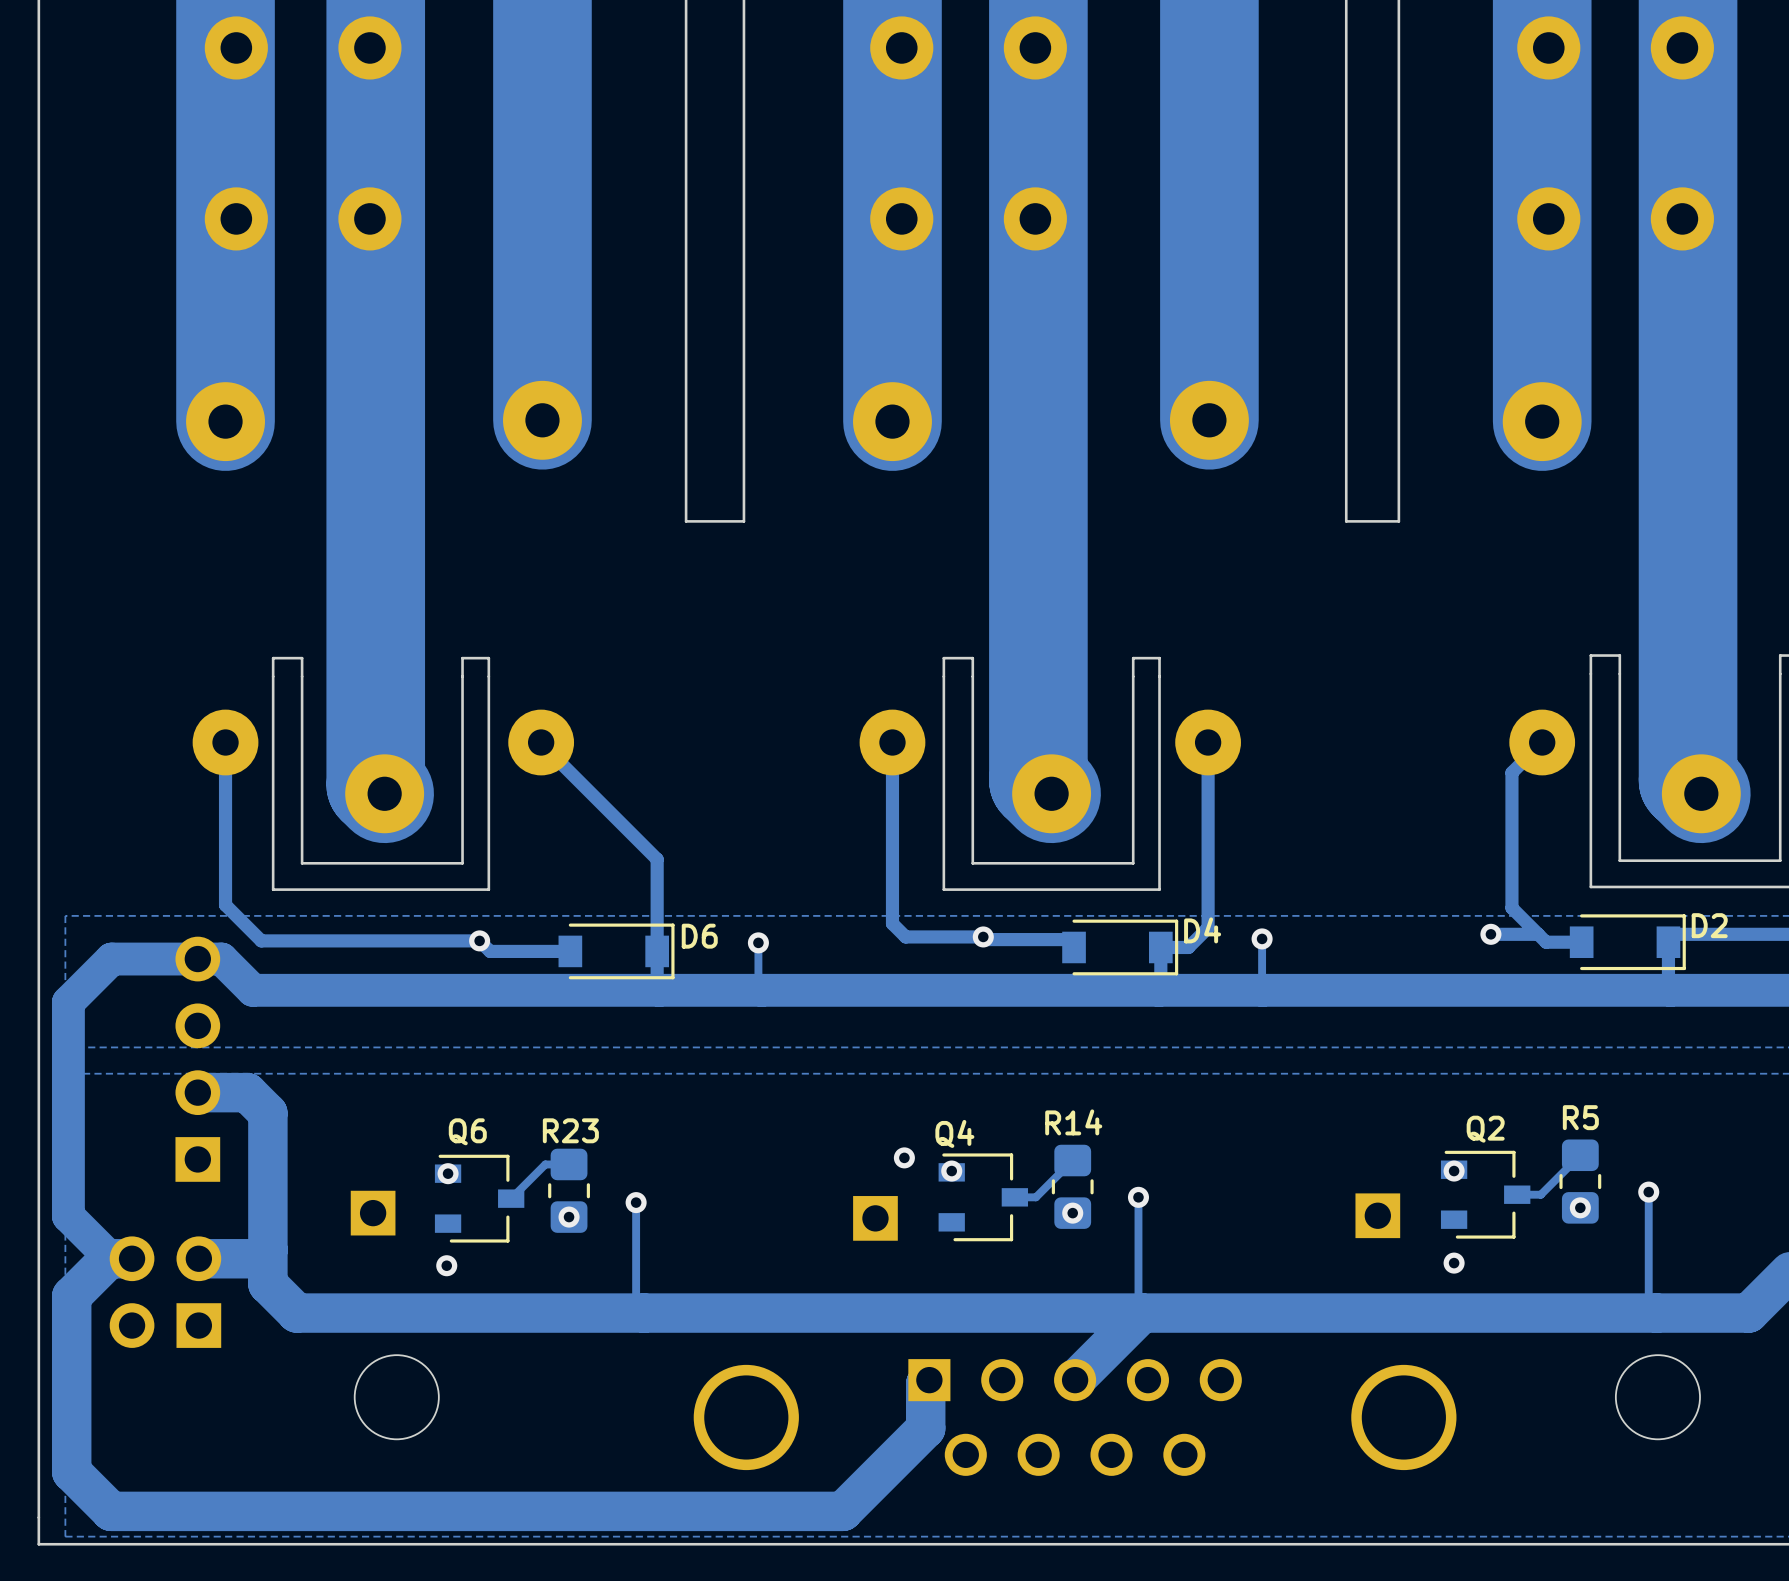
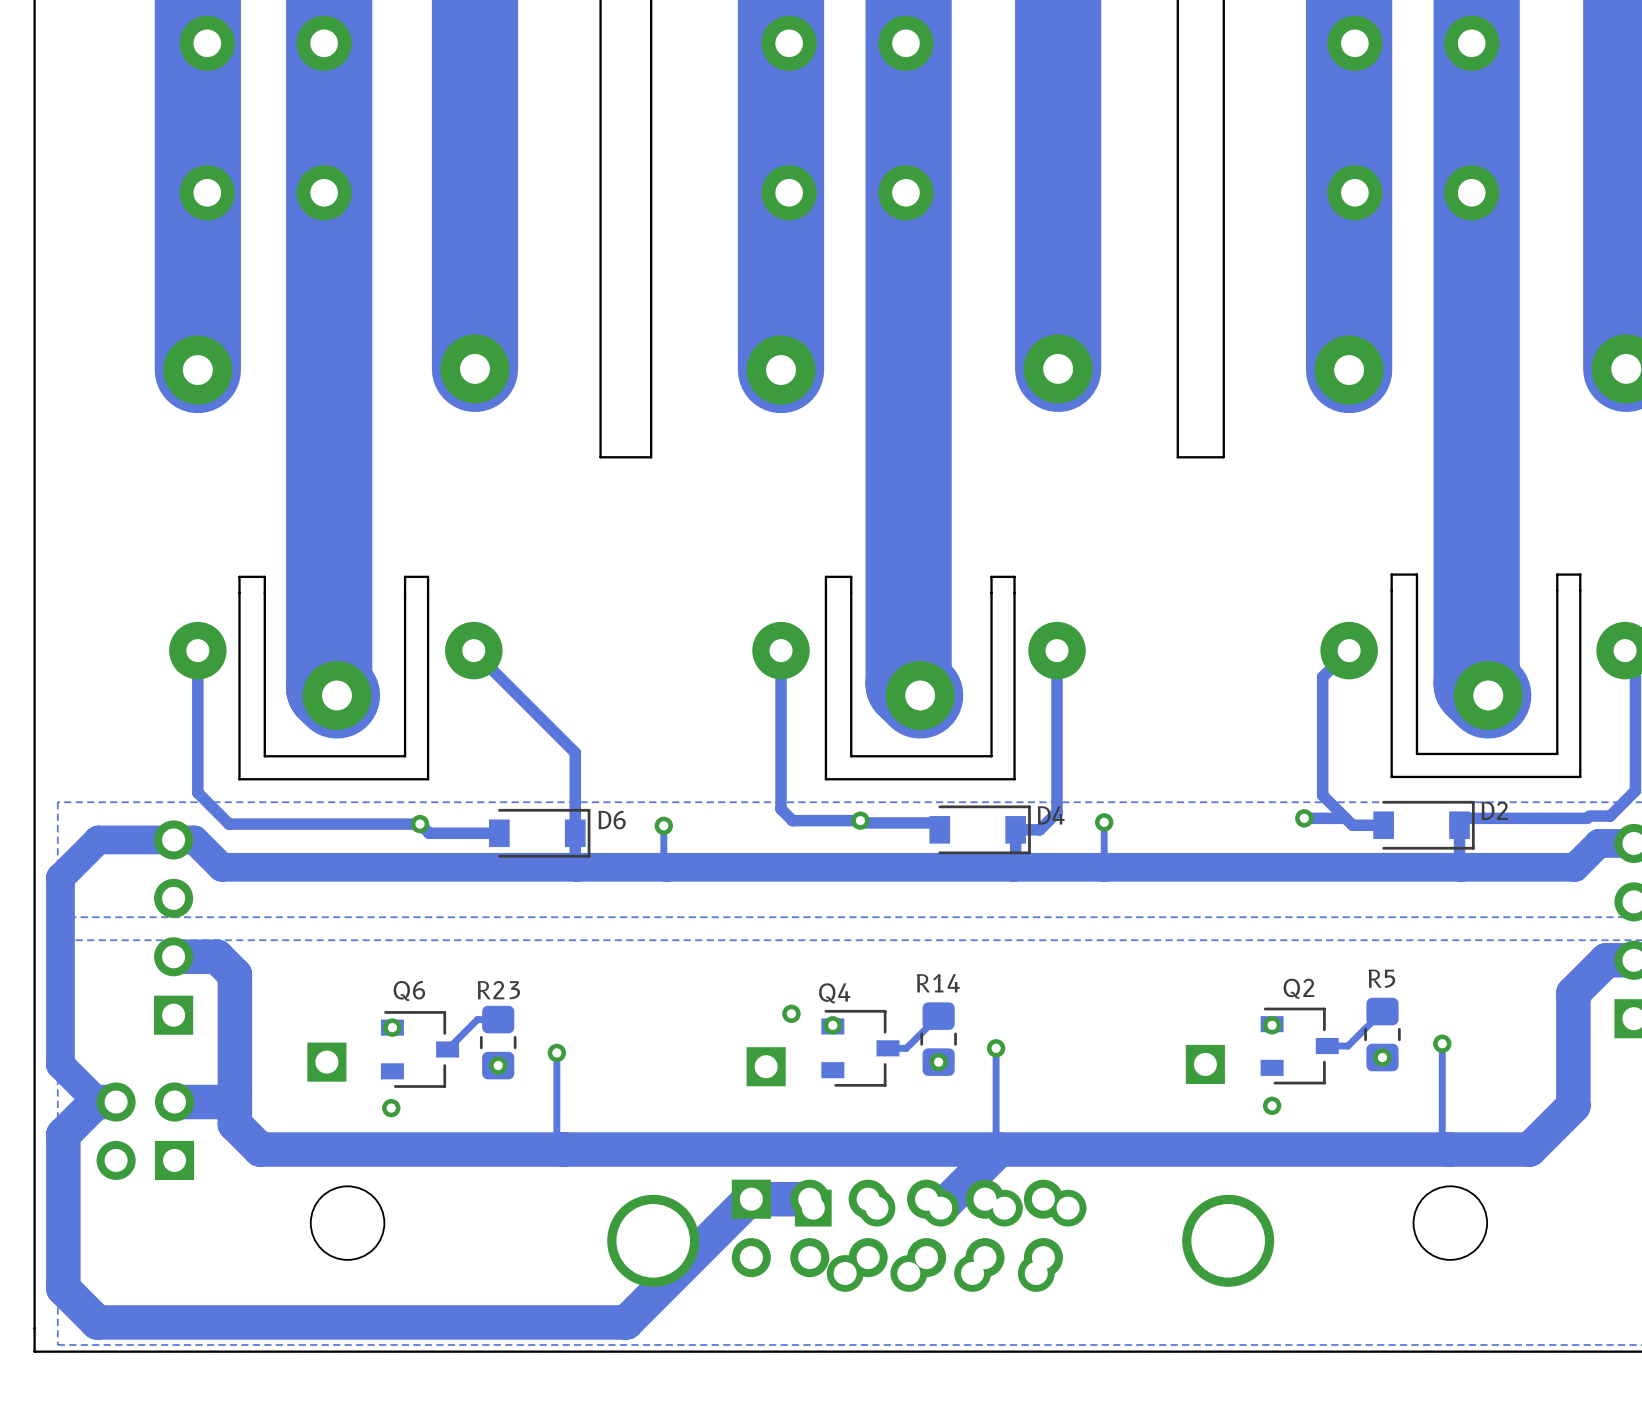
track: (929, 1380) (925, 1383) (925, 1428) (842, 1511) (110, 1510) -> (809, 1199) (749, 1199) (626, 1322) (97, 1322)
part: none -> (897, 1228)

